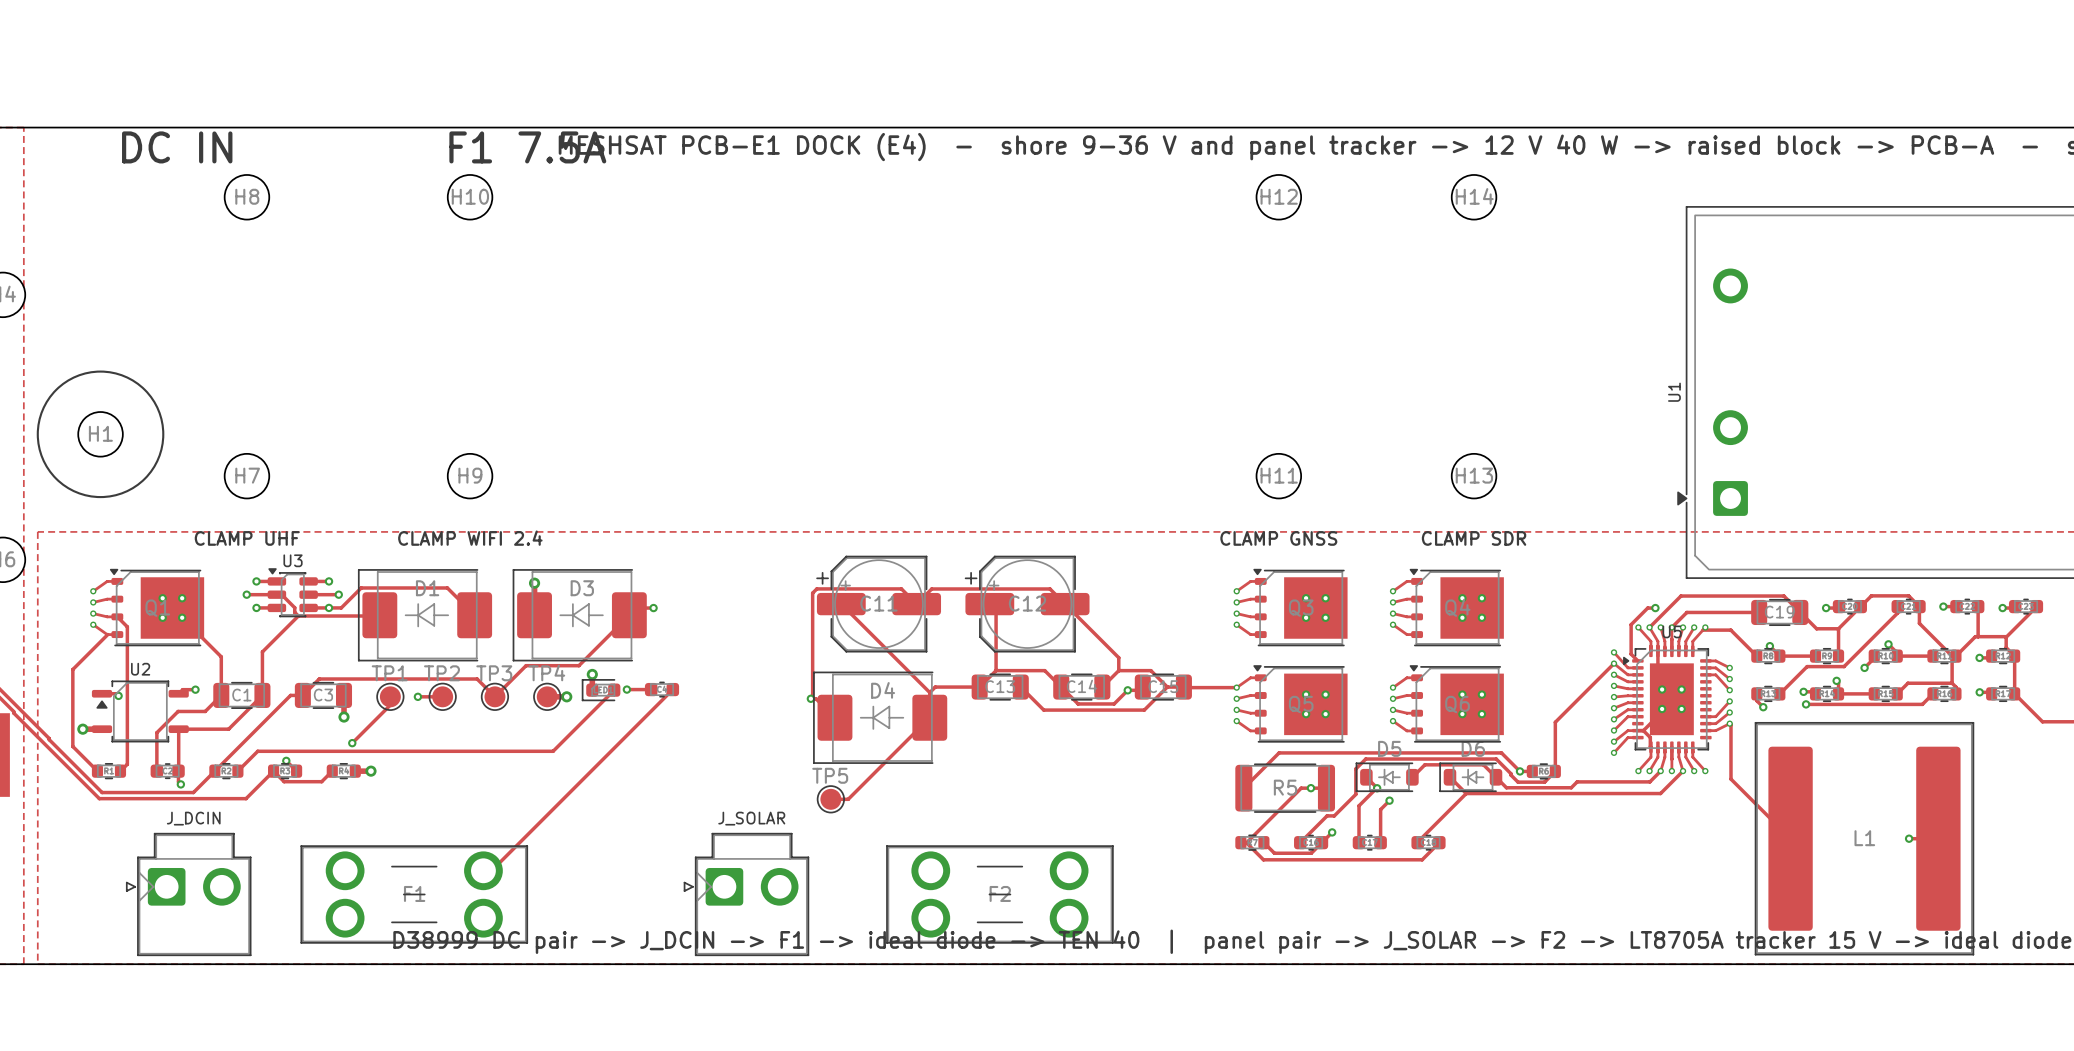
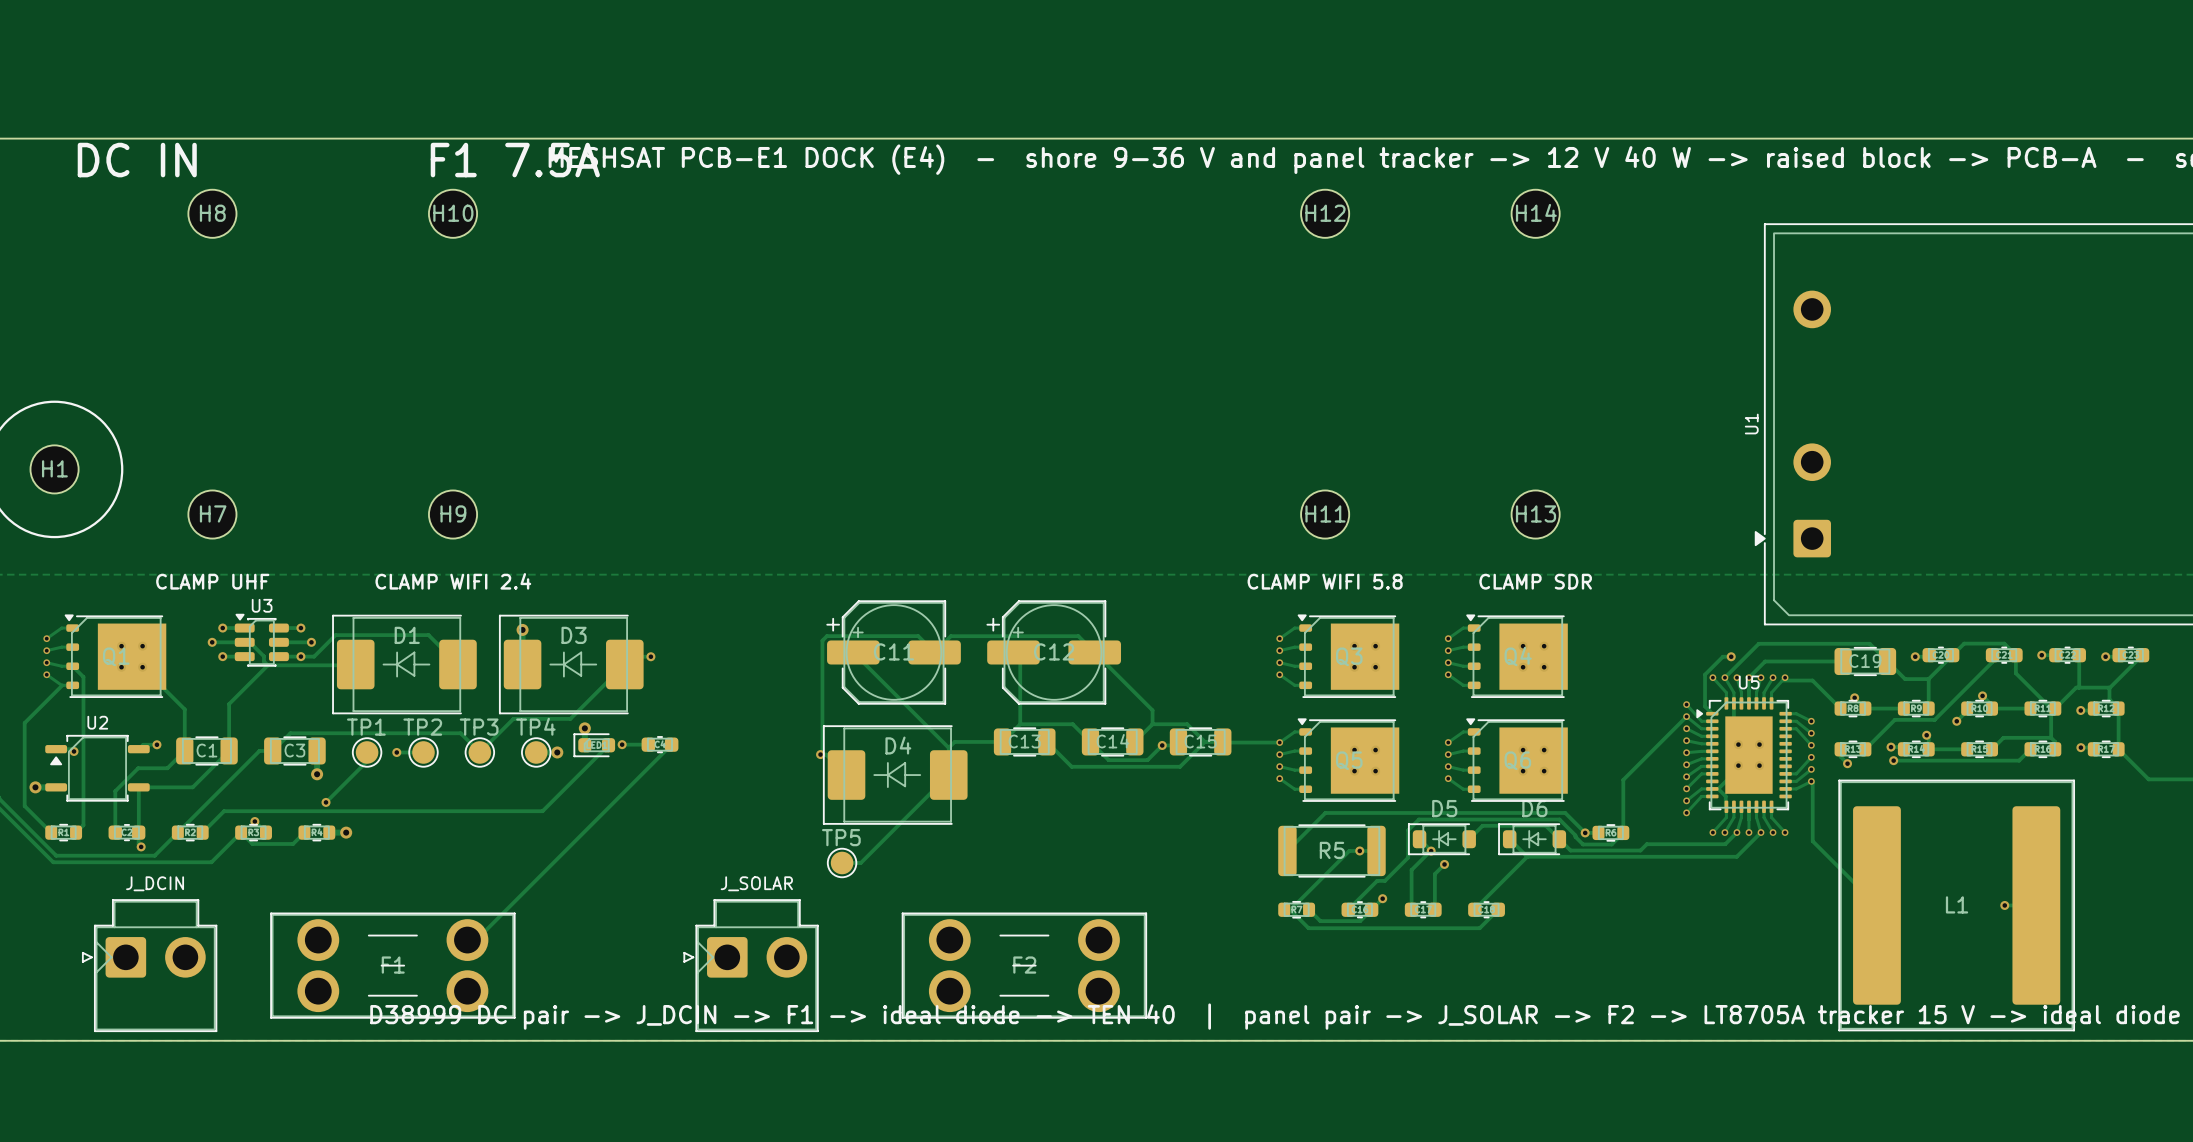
text: CLAMP GNSS (1278, 538) -> CLAMP WIFI 5.8 (1325, 581)

